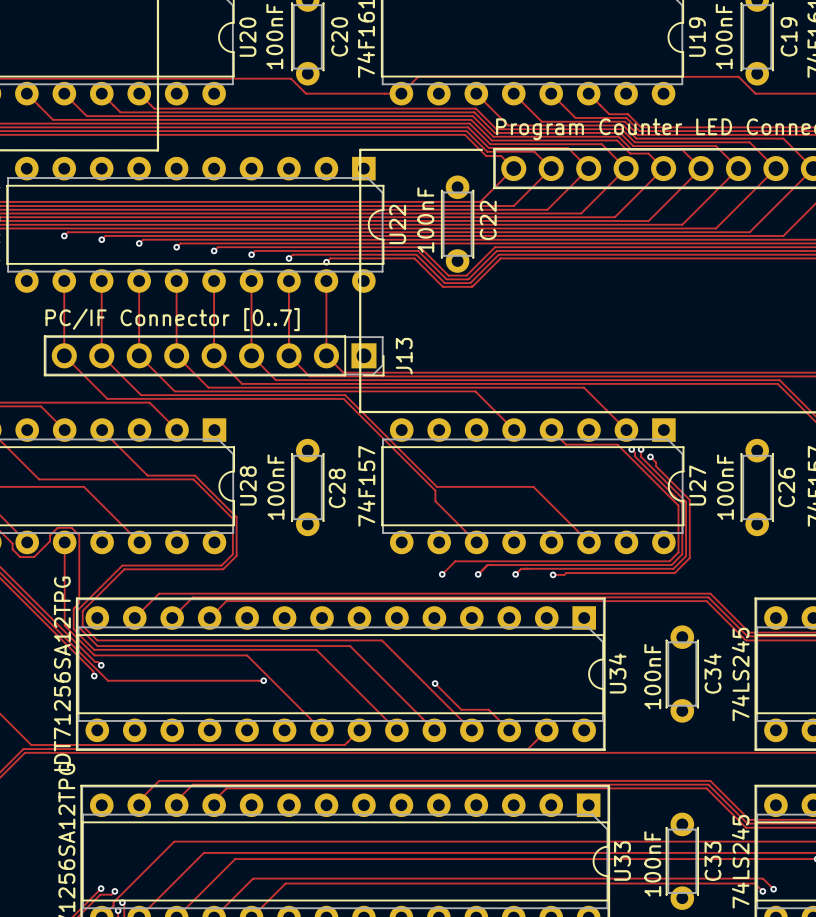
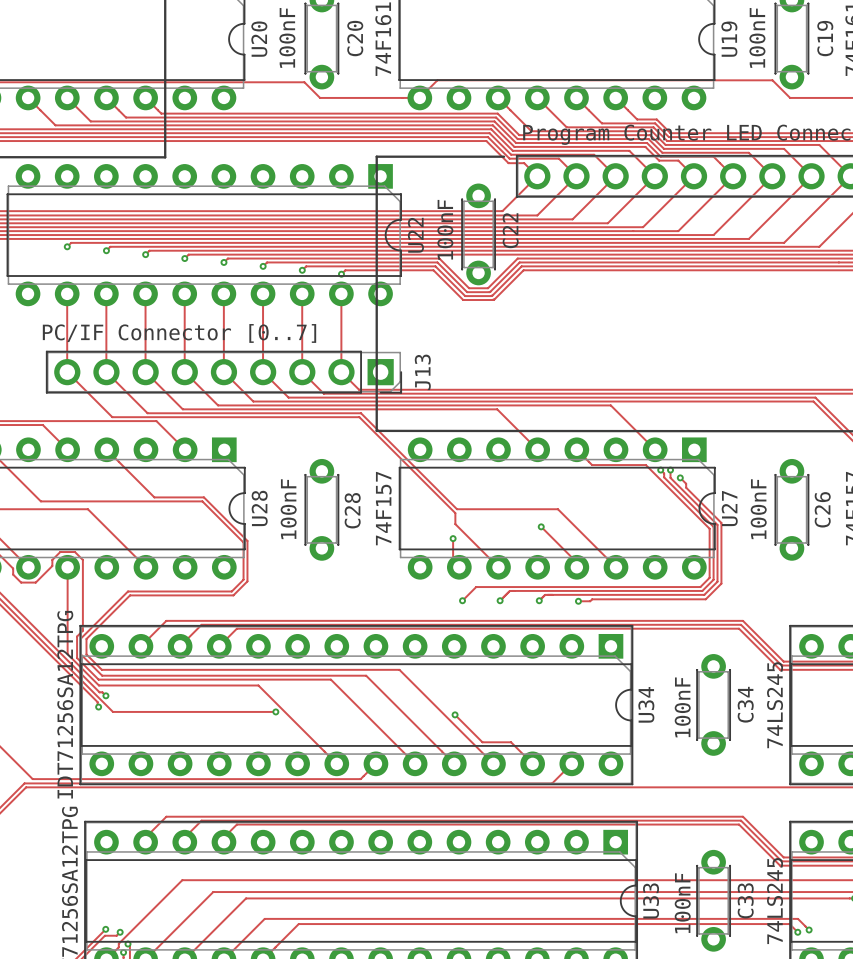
track: none -> (541, 526) (576, 562) (576, 567)
via: none -> (541, 526)
track: none -> (453, 538) (453, 561) (459, 567)
via: none -> (453, 538)

